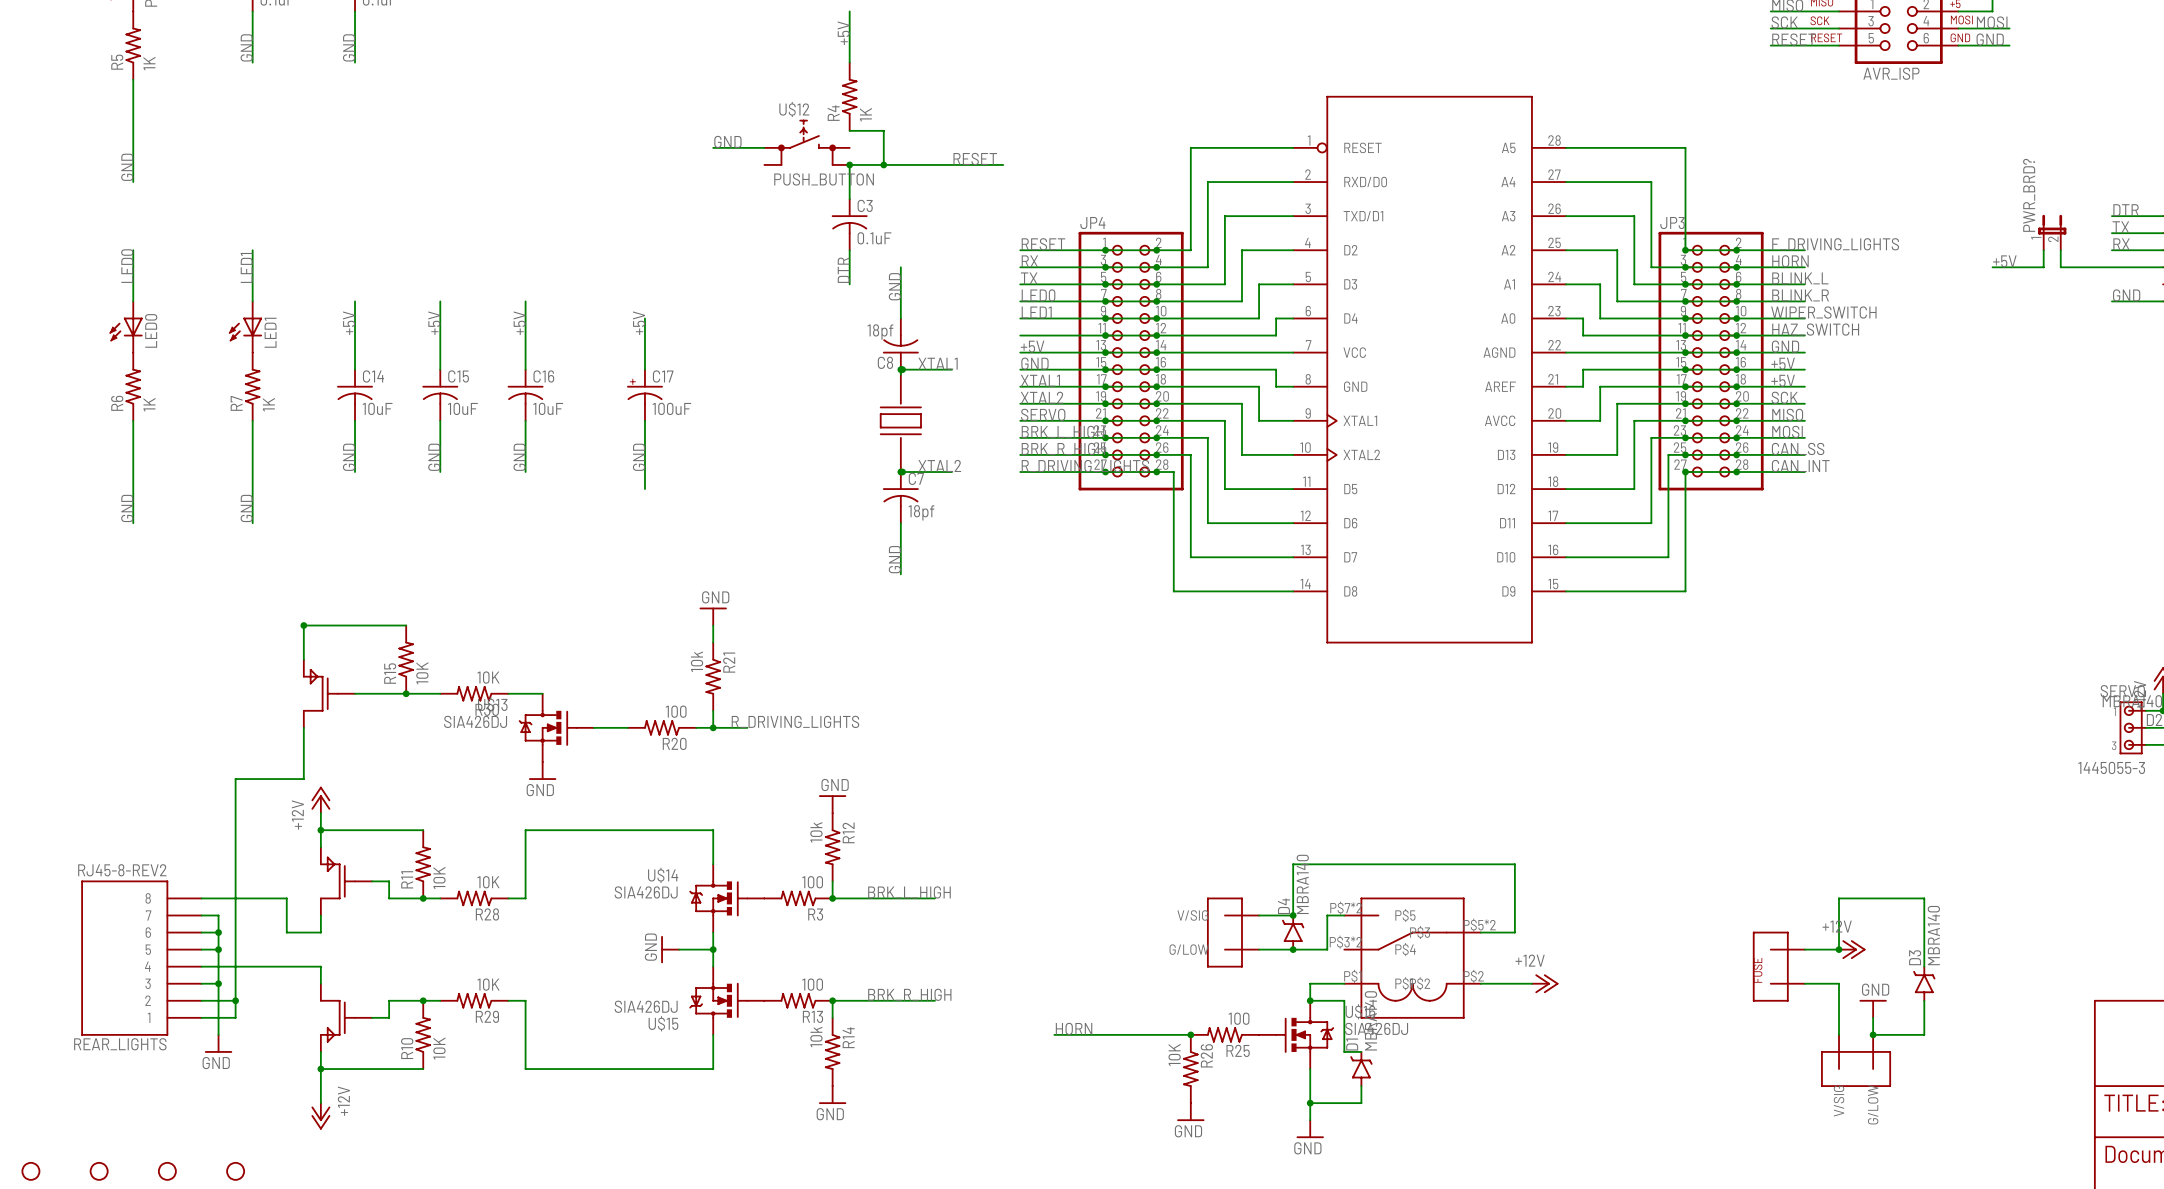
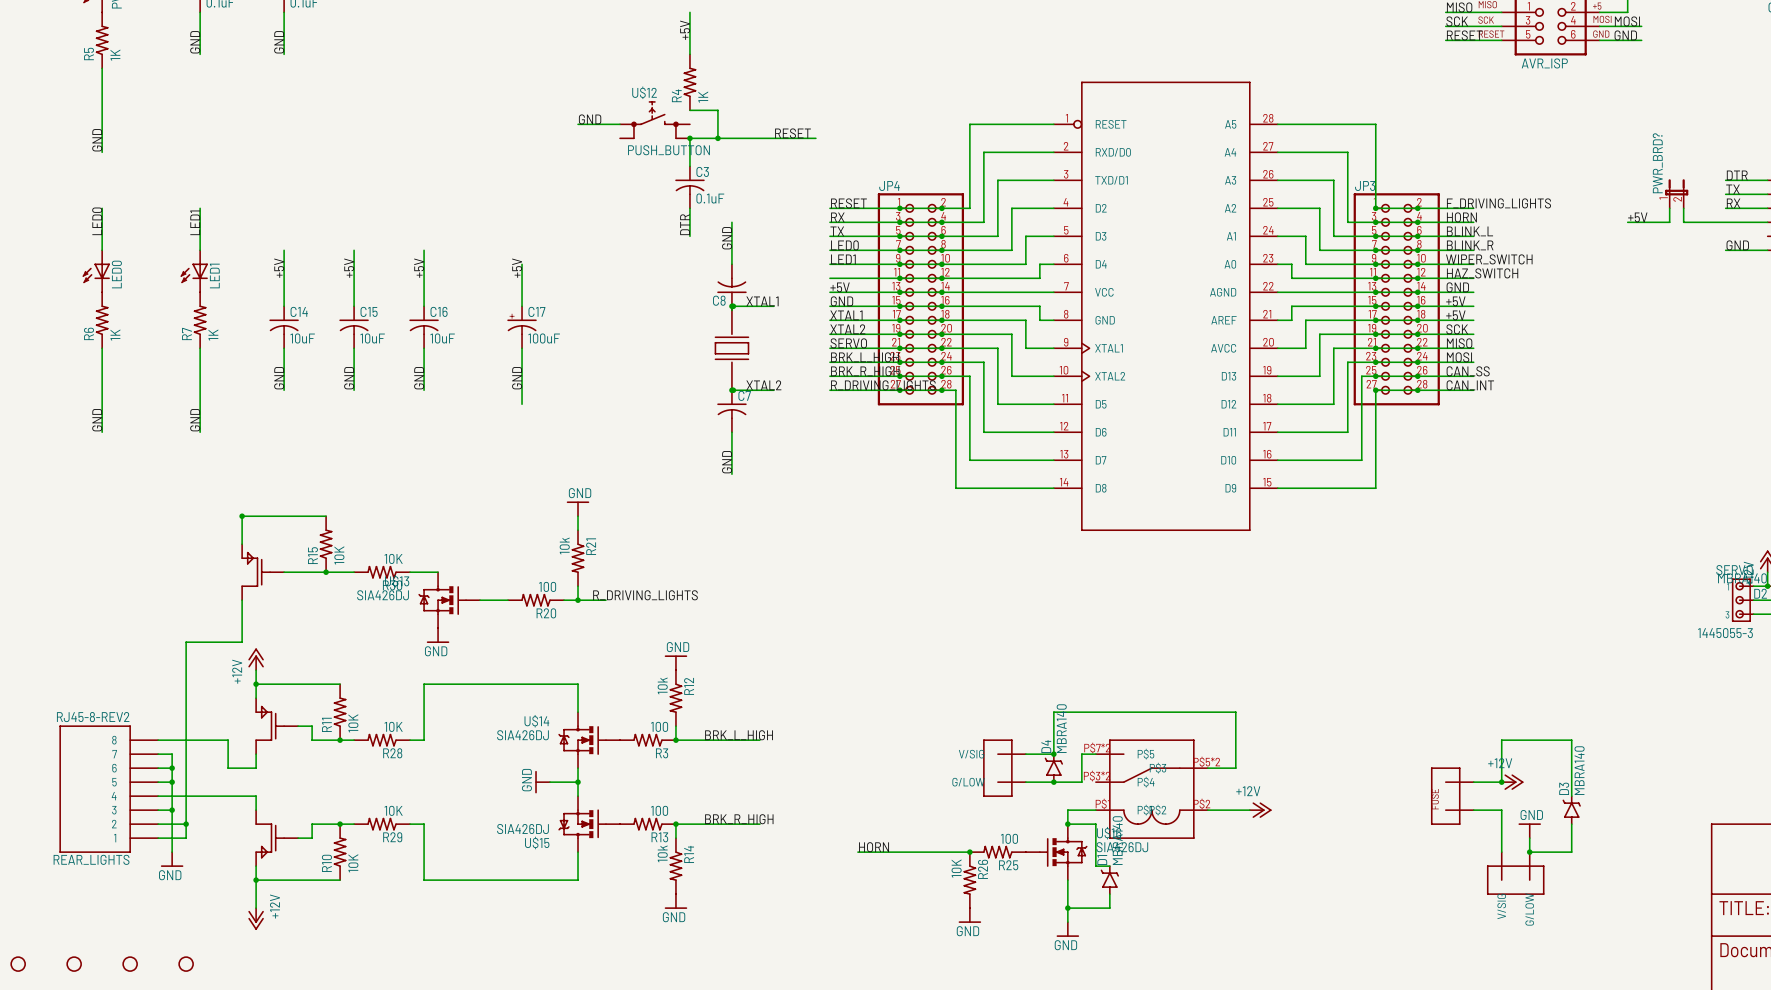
C8 value: 18pf (880, 331) -> none
C7 value: 18pf (921, 512) -> none

